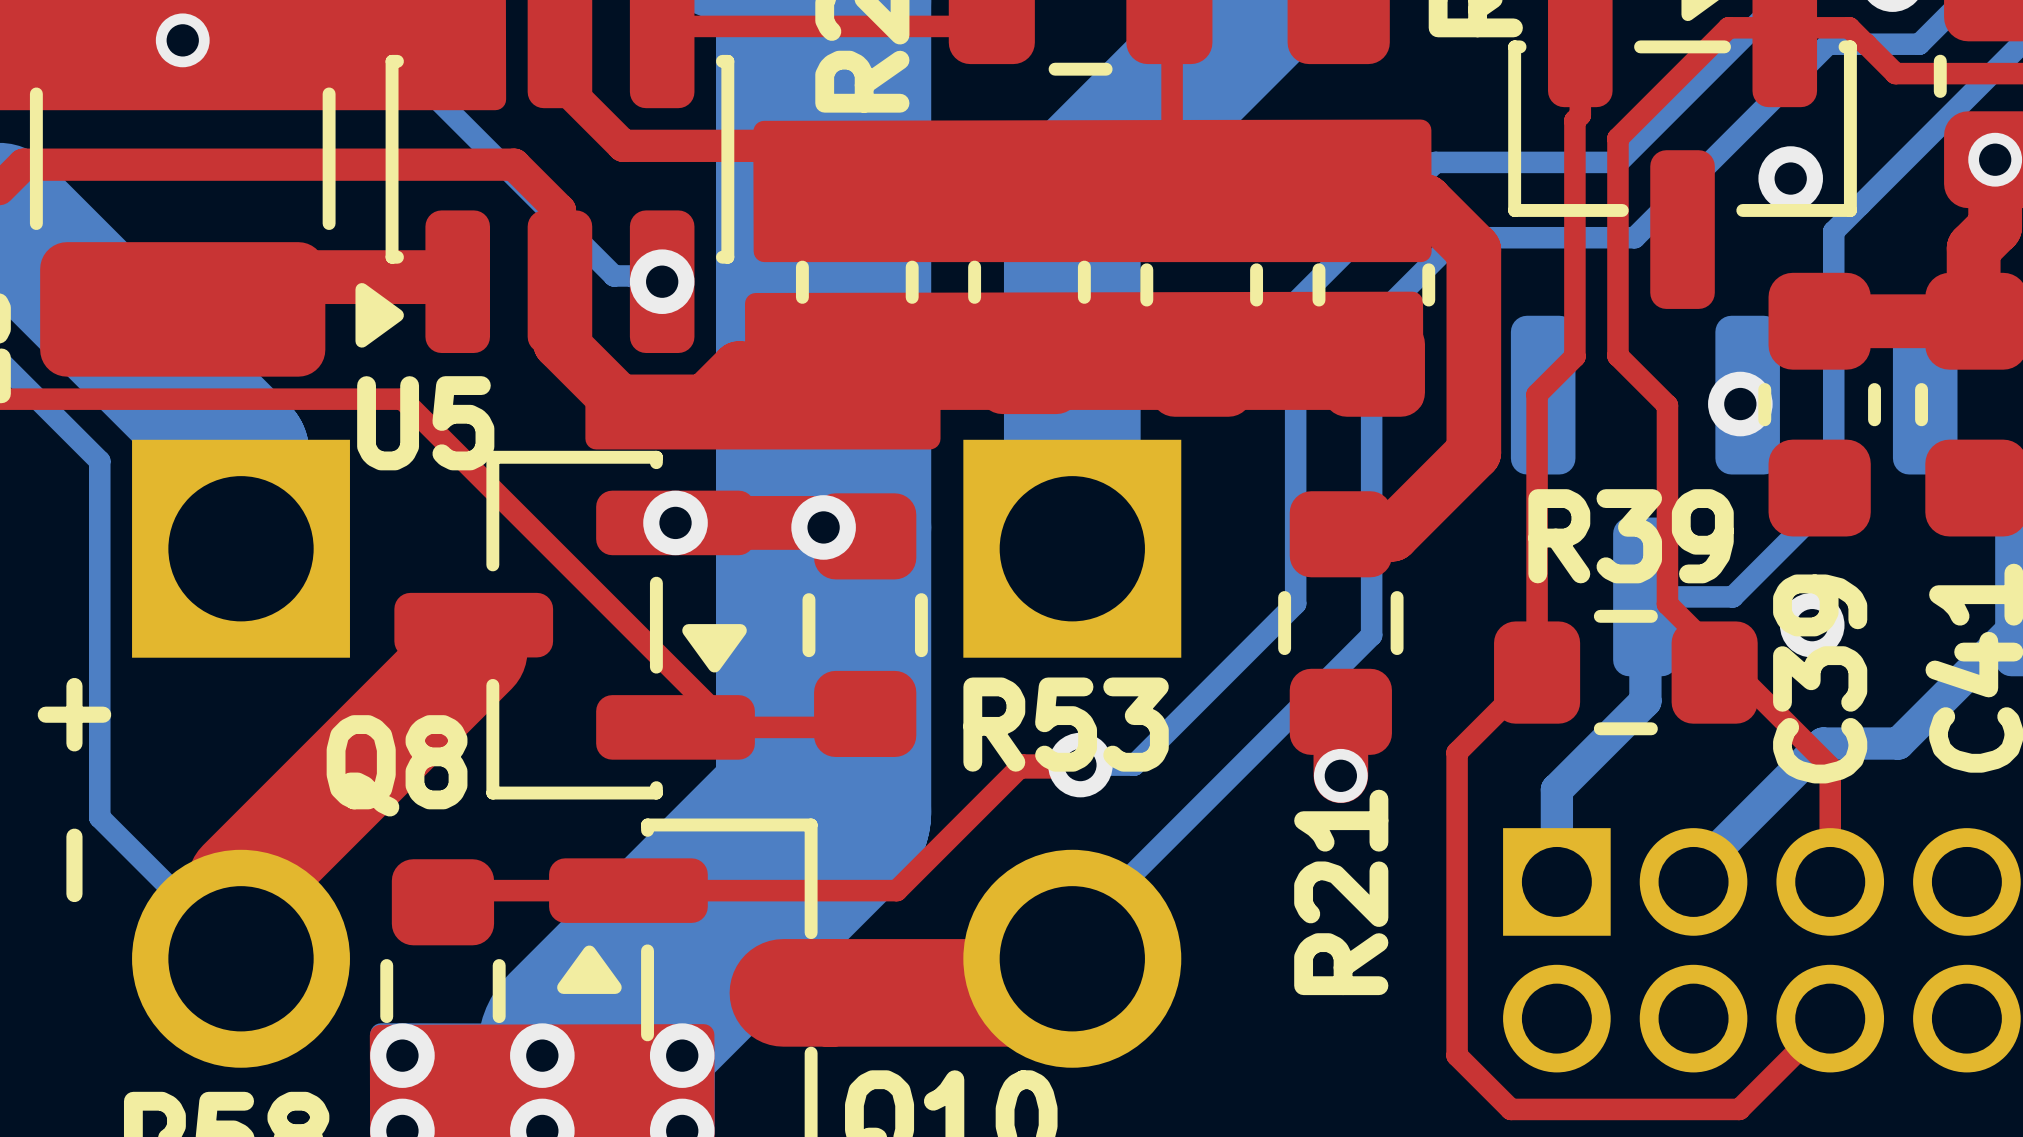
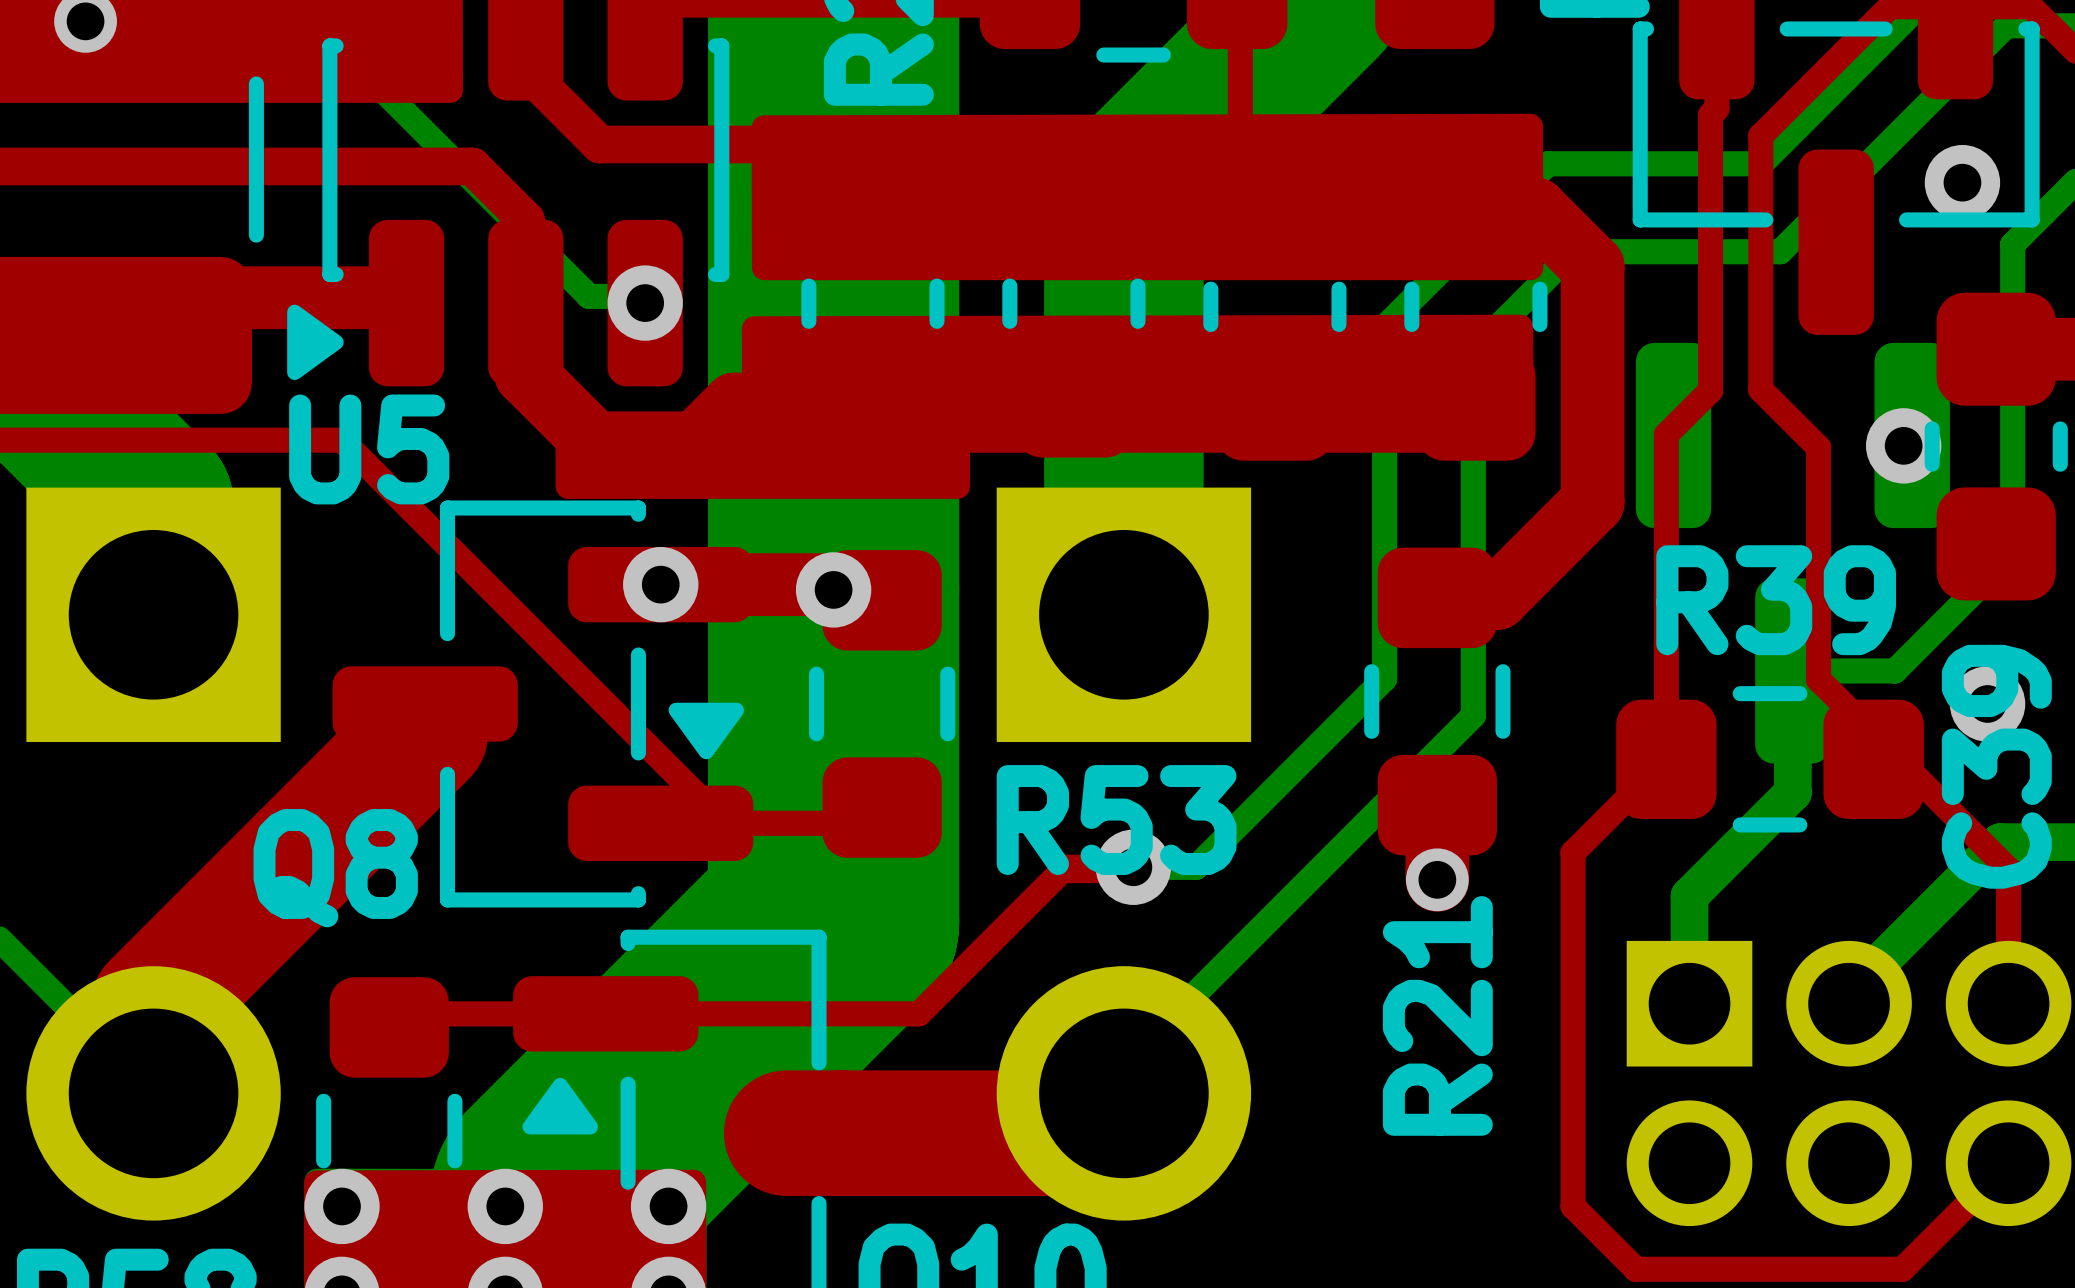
U5 name position: U5 (425, 423) -> U5 (369, 449)

